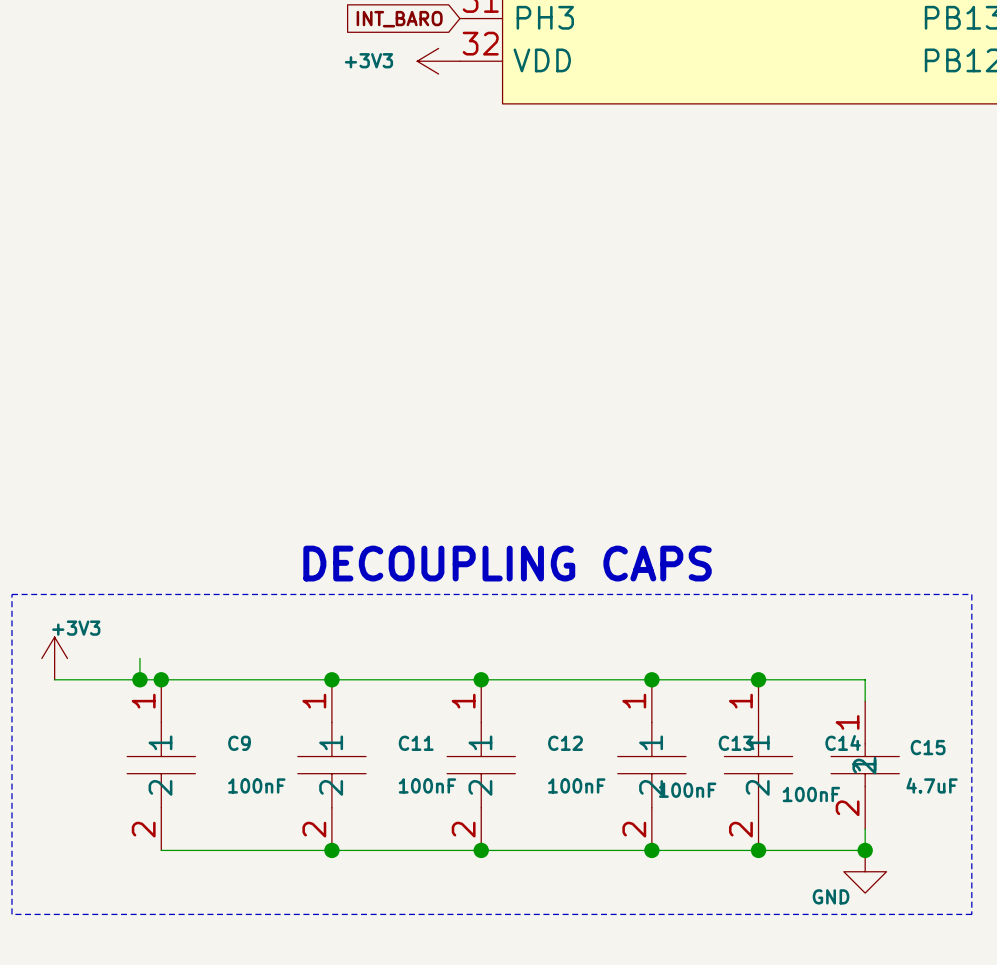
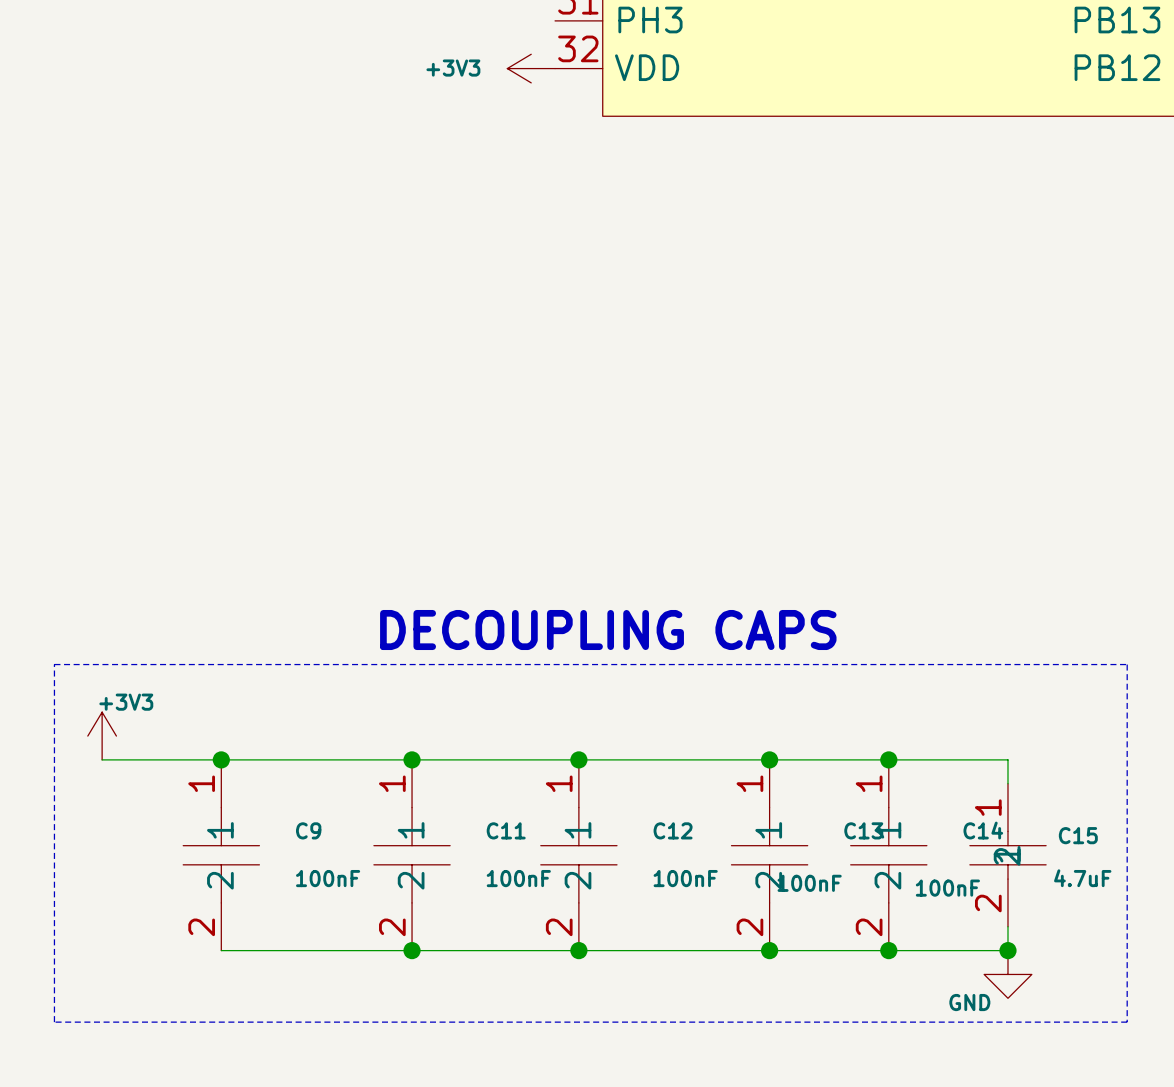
global label: INT_BARO (399, 19) -> none
wire: (139, 658) (139, 679) -> none
junction: (139, 679) -> none

